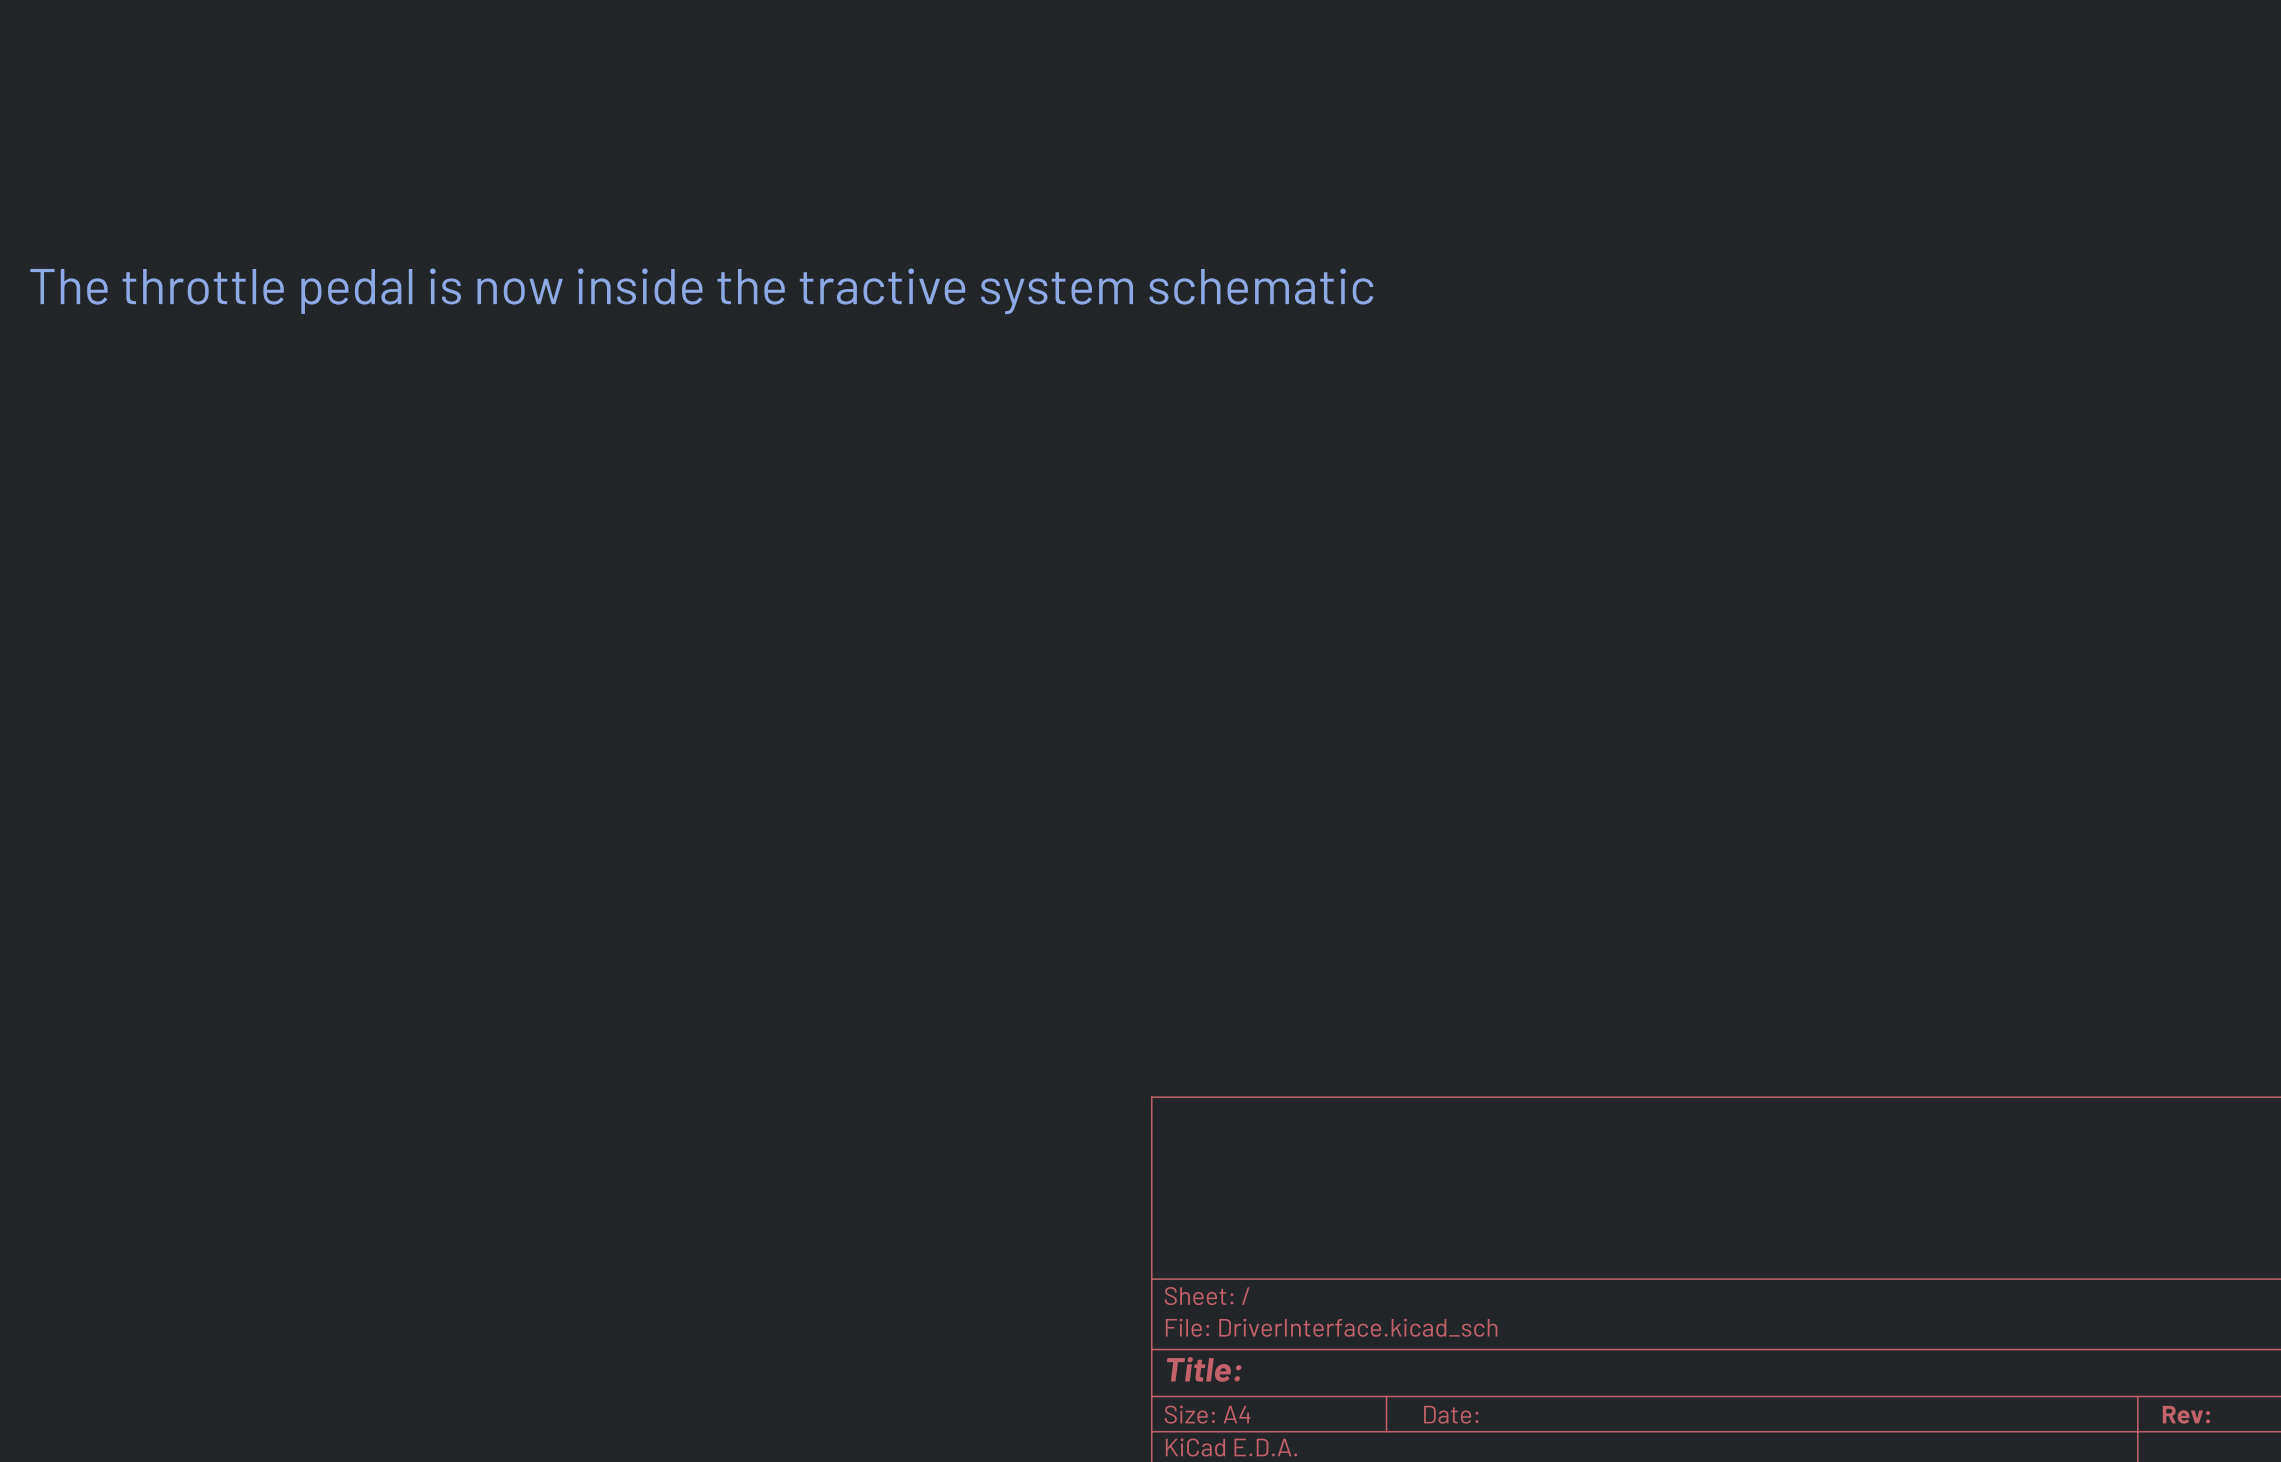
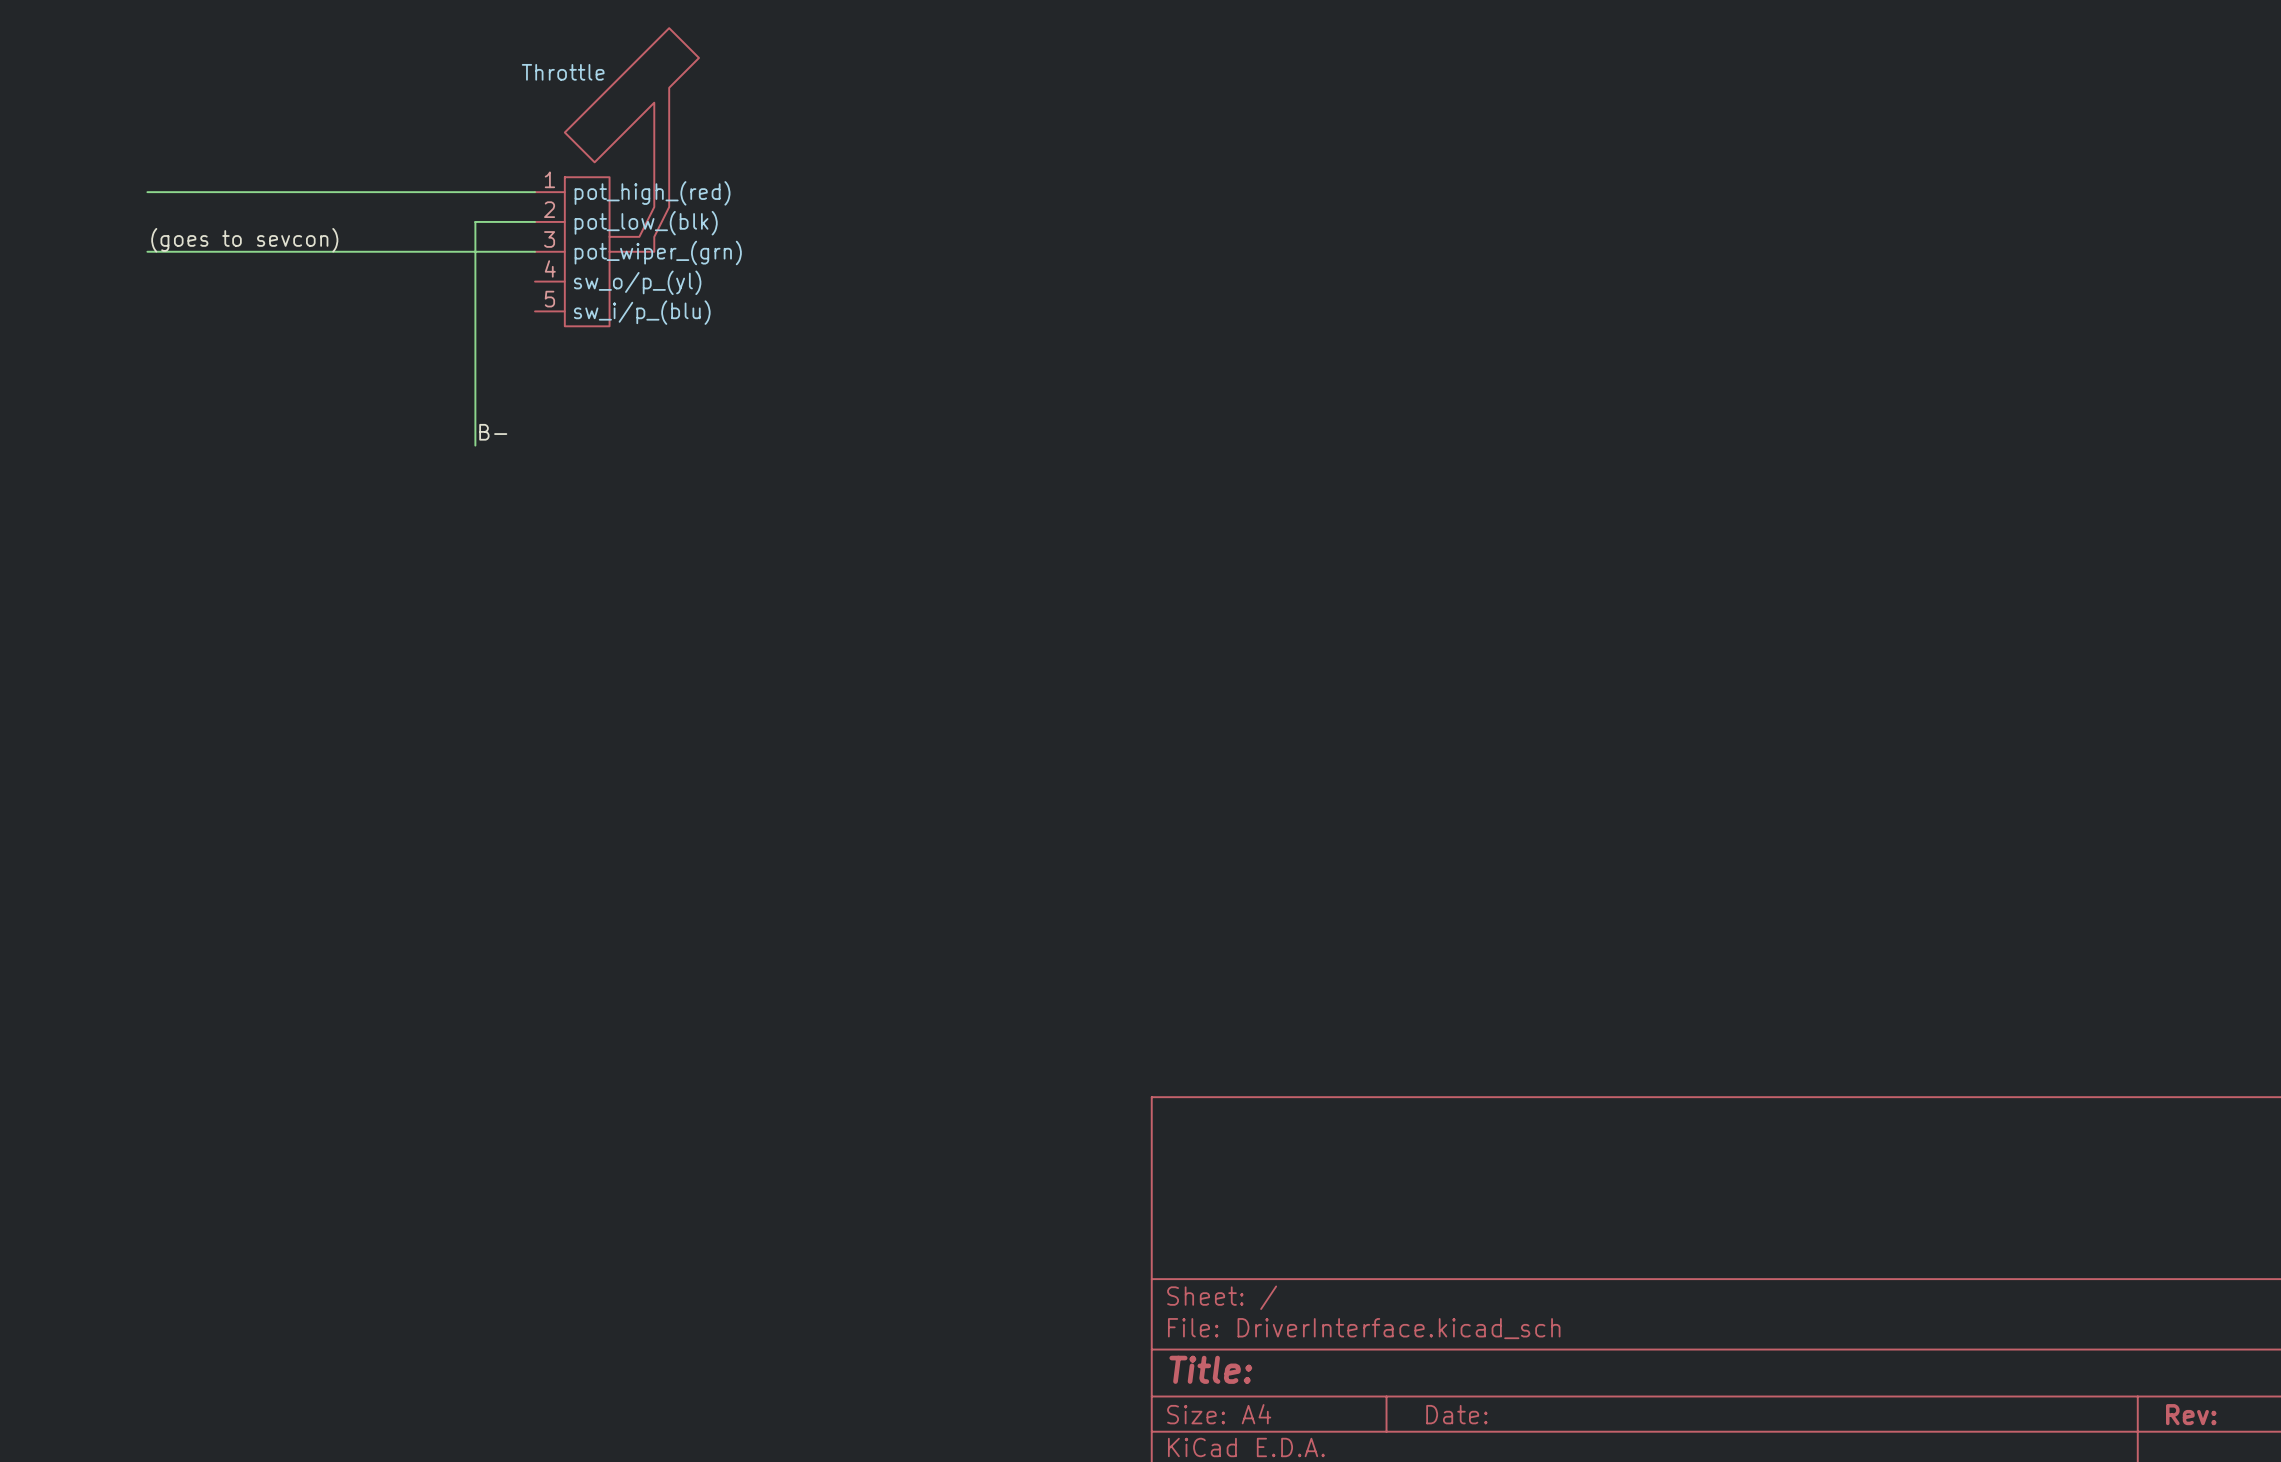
part: none -> Throttle (617, 177)
wire: none -> (147, 192) (535, 192)
wire: none -> (535, 221) (475, 221) (475, 445)
label: none -> (goes to sevcon) (244, 240)
wire: none -> (147, 251) (535, 251)
text: The throttle pedal is now inside the tractive system schematic (701, 291) -> none
label: none -> B- (493, 432)

